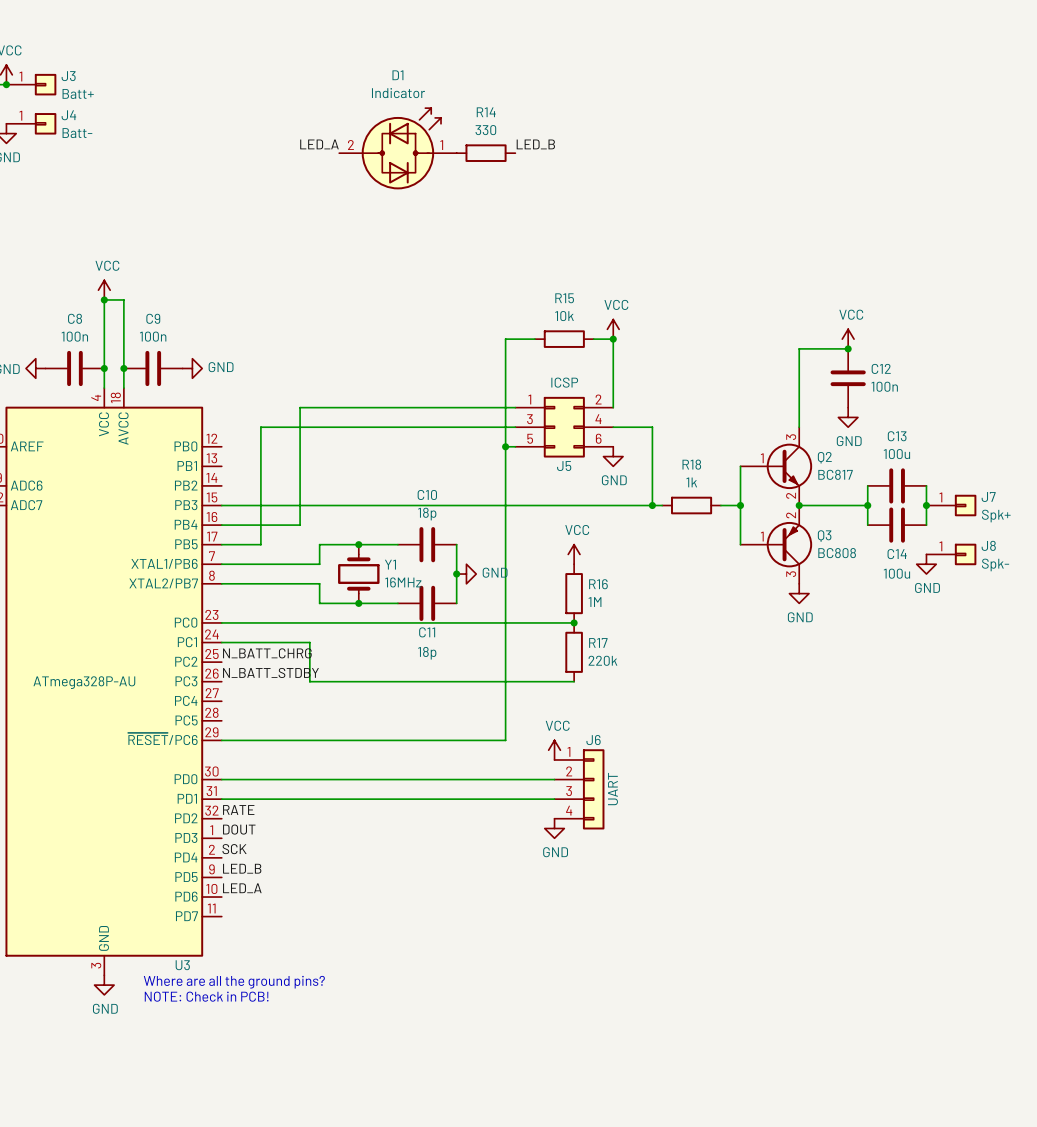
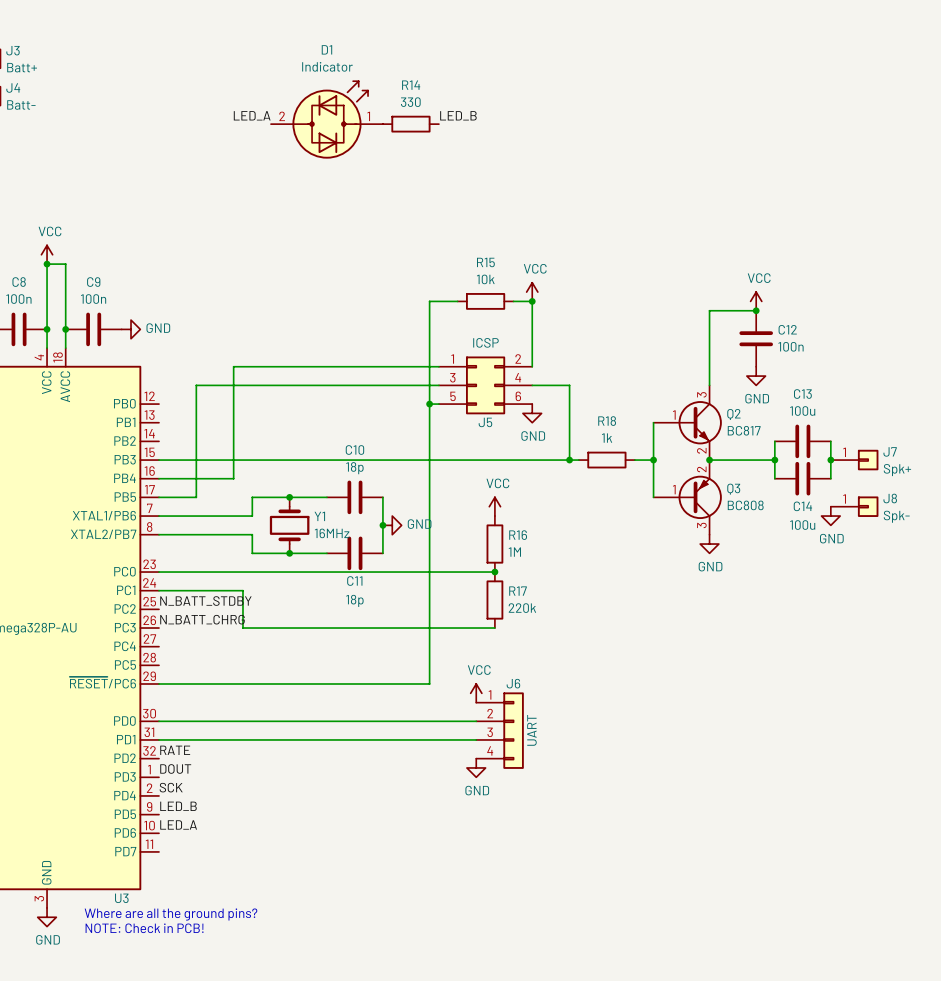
label: N_BATT_CHRG (267, 653) -> N_BATT_STDBY (205, 601)
label: N_BATT_STDBY (270, 672) -> N_BATT_CHRG (202, 619)

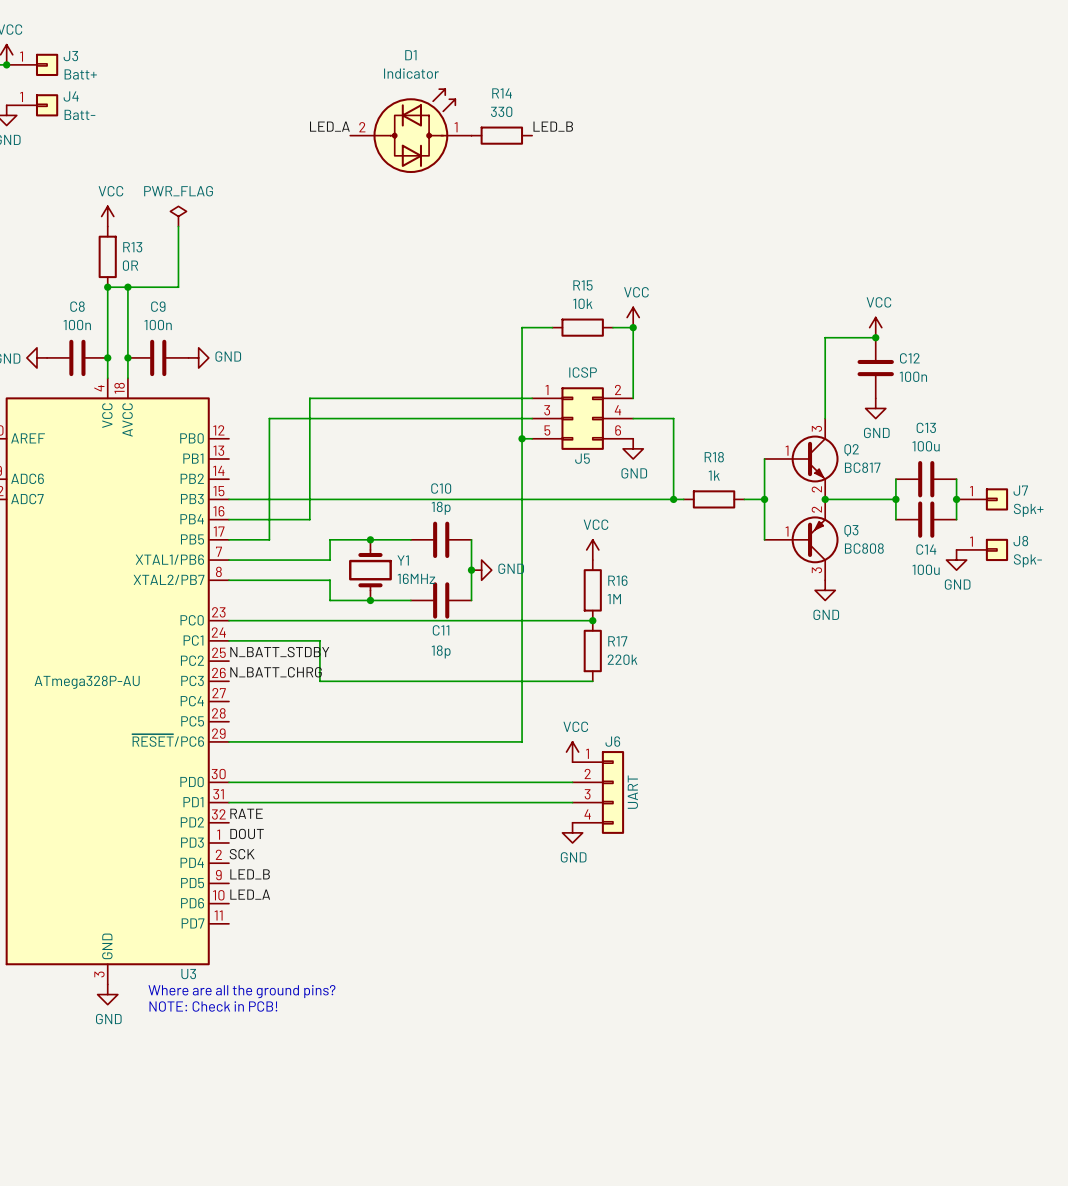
power symbol: none -> PWR_FLAG (178, 216)
wire: none -> (178, 226) (178, 287) (127, 287)
R13: none -> 0R (107, 256)
power symbol position: VCC (47, 254) -> VCC (107, 216)
junction: none -> (127, 287)

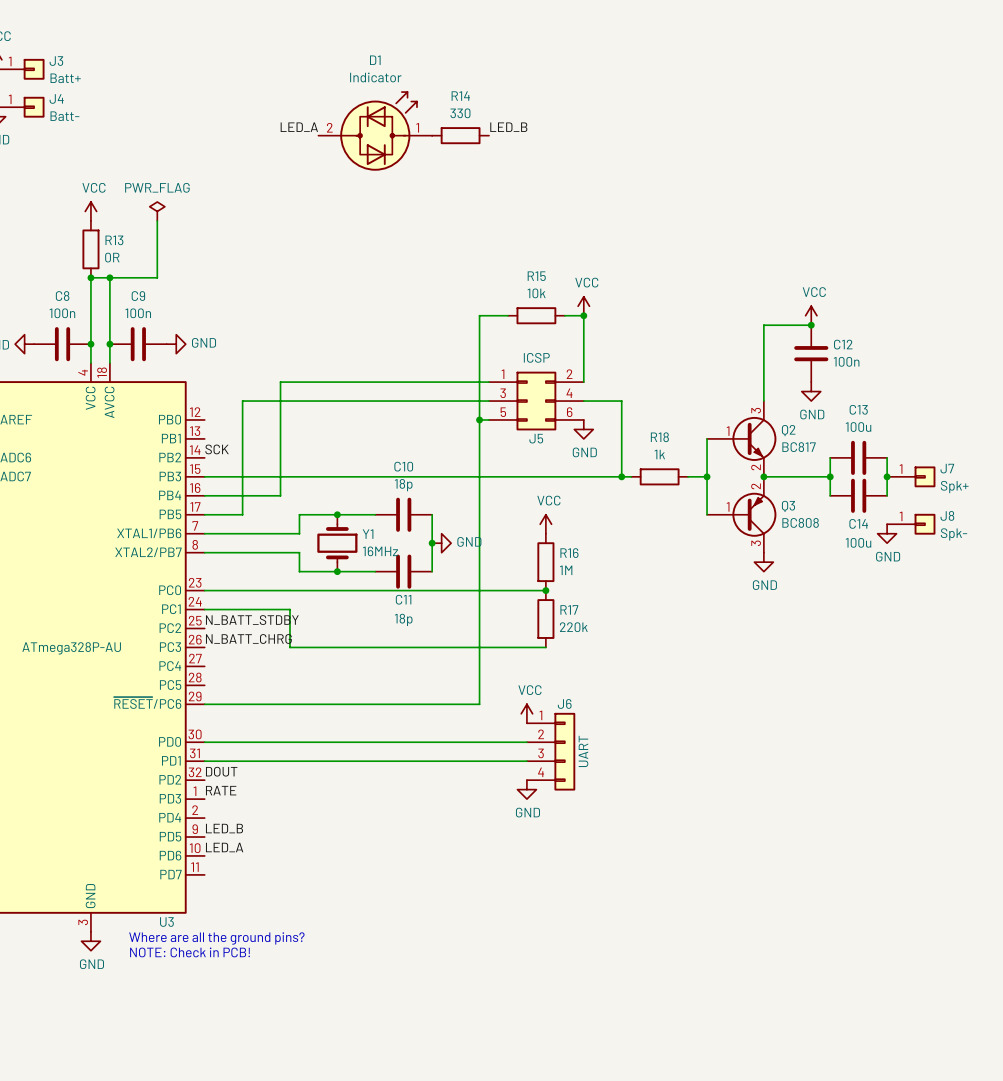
label: none -> SCK (217, 449)
label: RATE (246, 813) -> DOUT (221, 771)
label: DOUT (247, 833) -> RATE (221, 790)
label: SCK (242, 854) -> none

